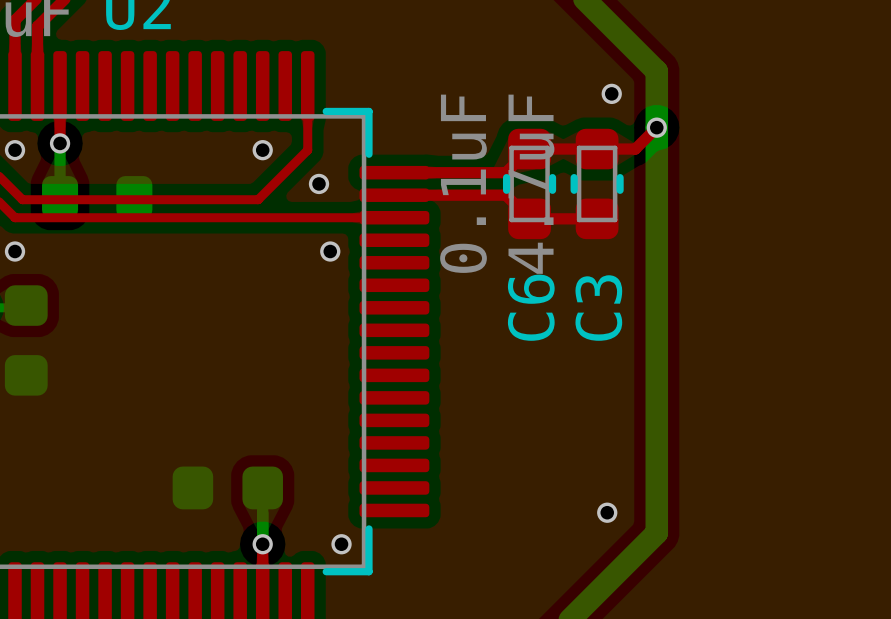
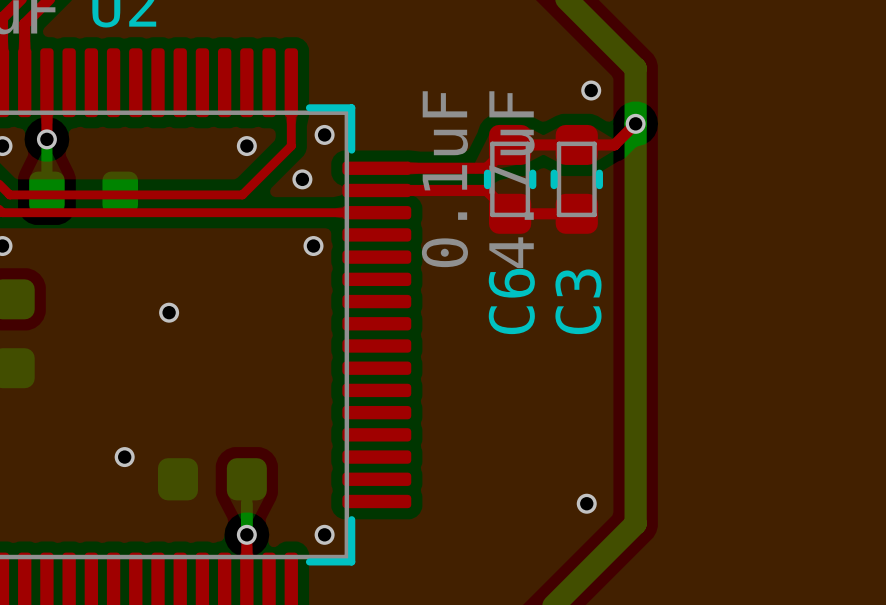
via: none -> (324, 134)
via: none -> (169, 312)
via: none -> (124, 457)

